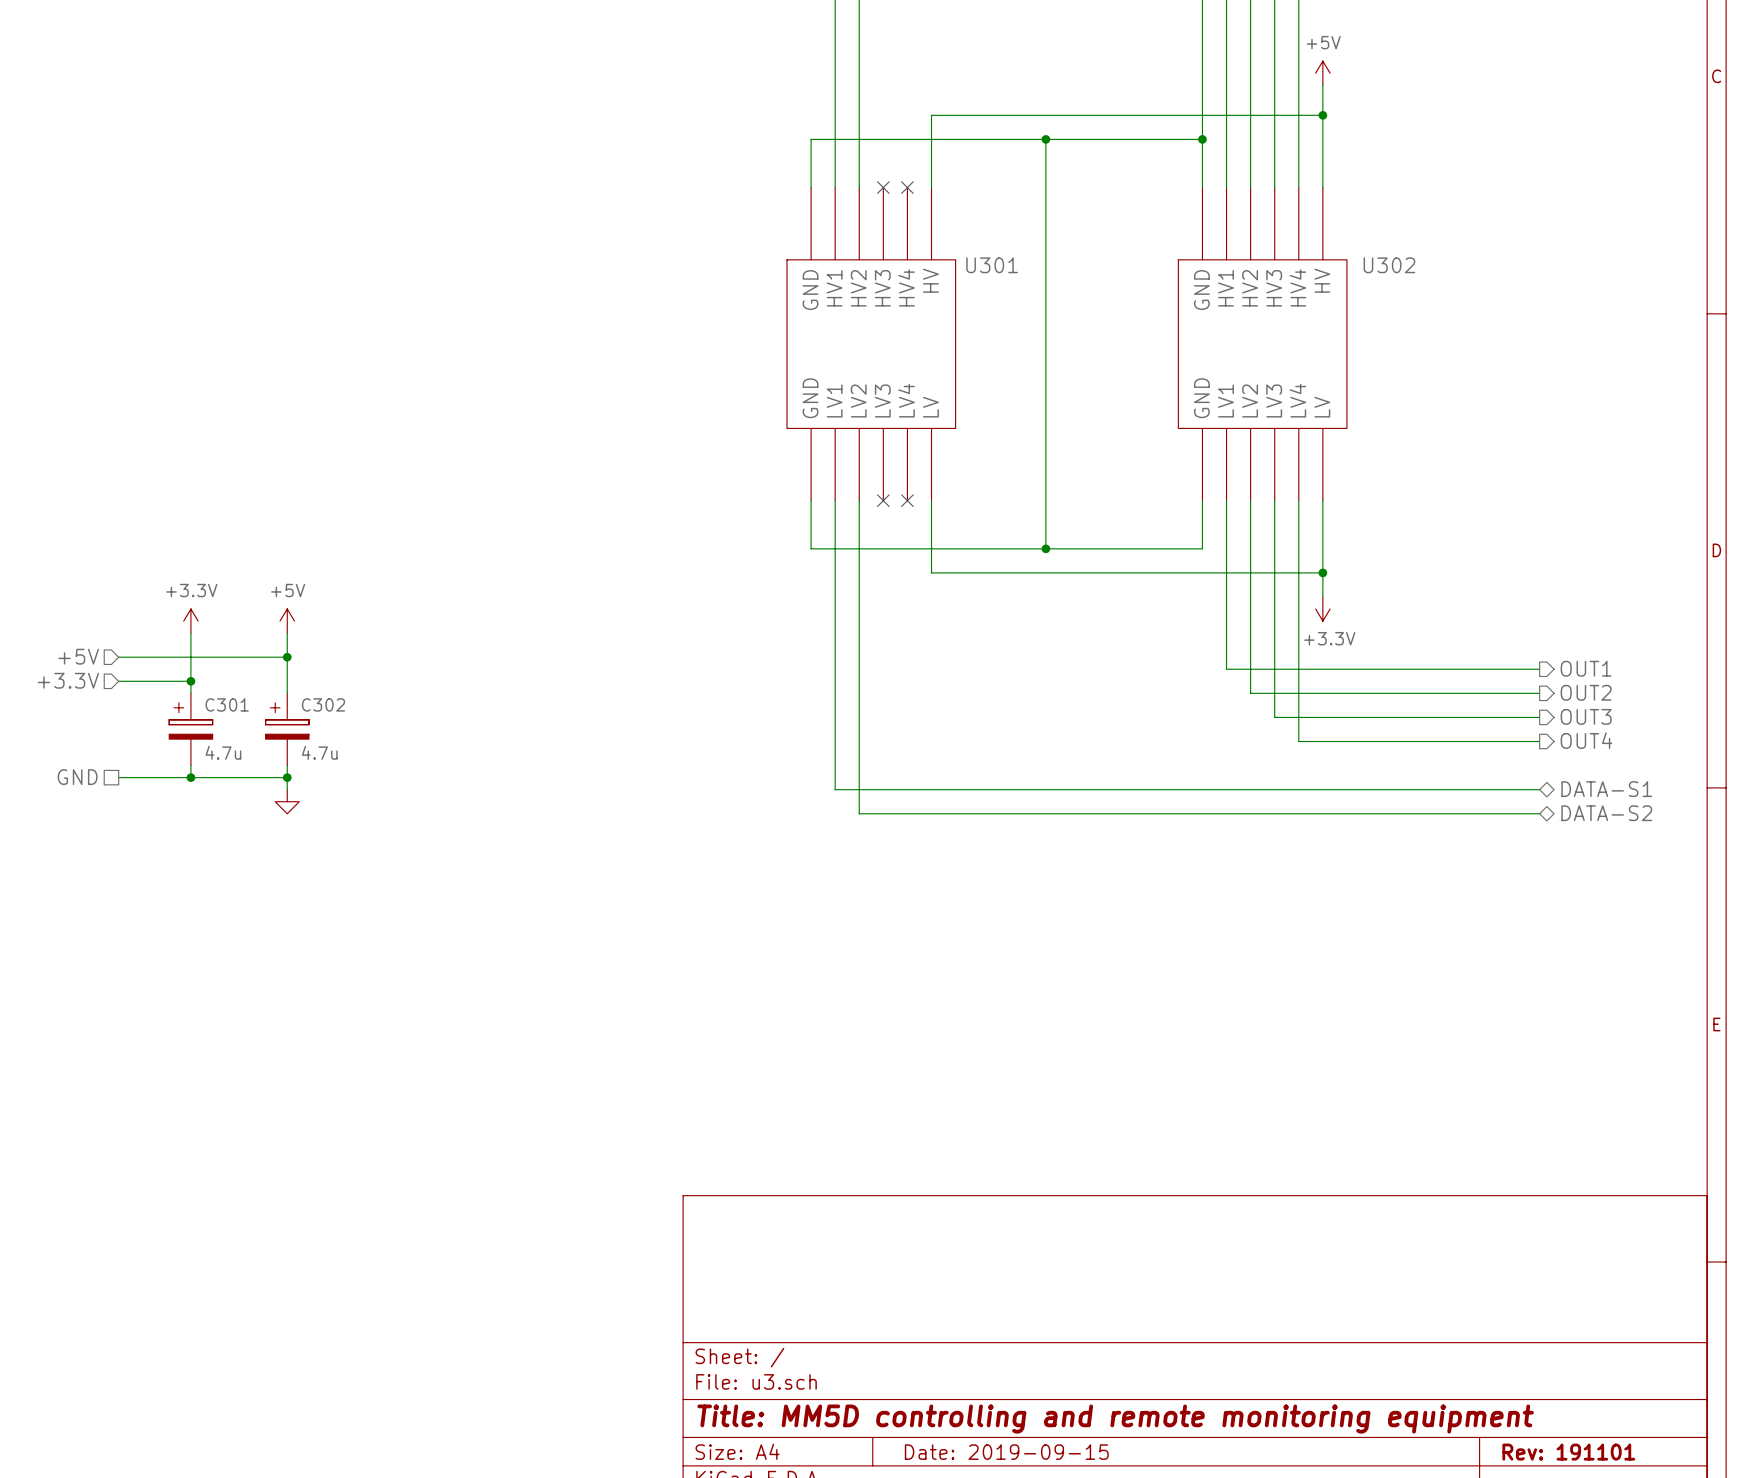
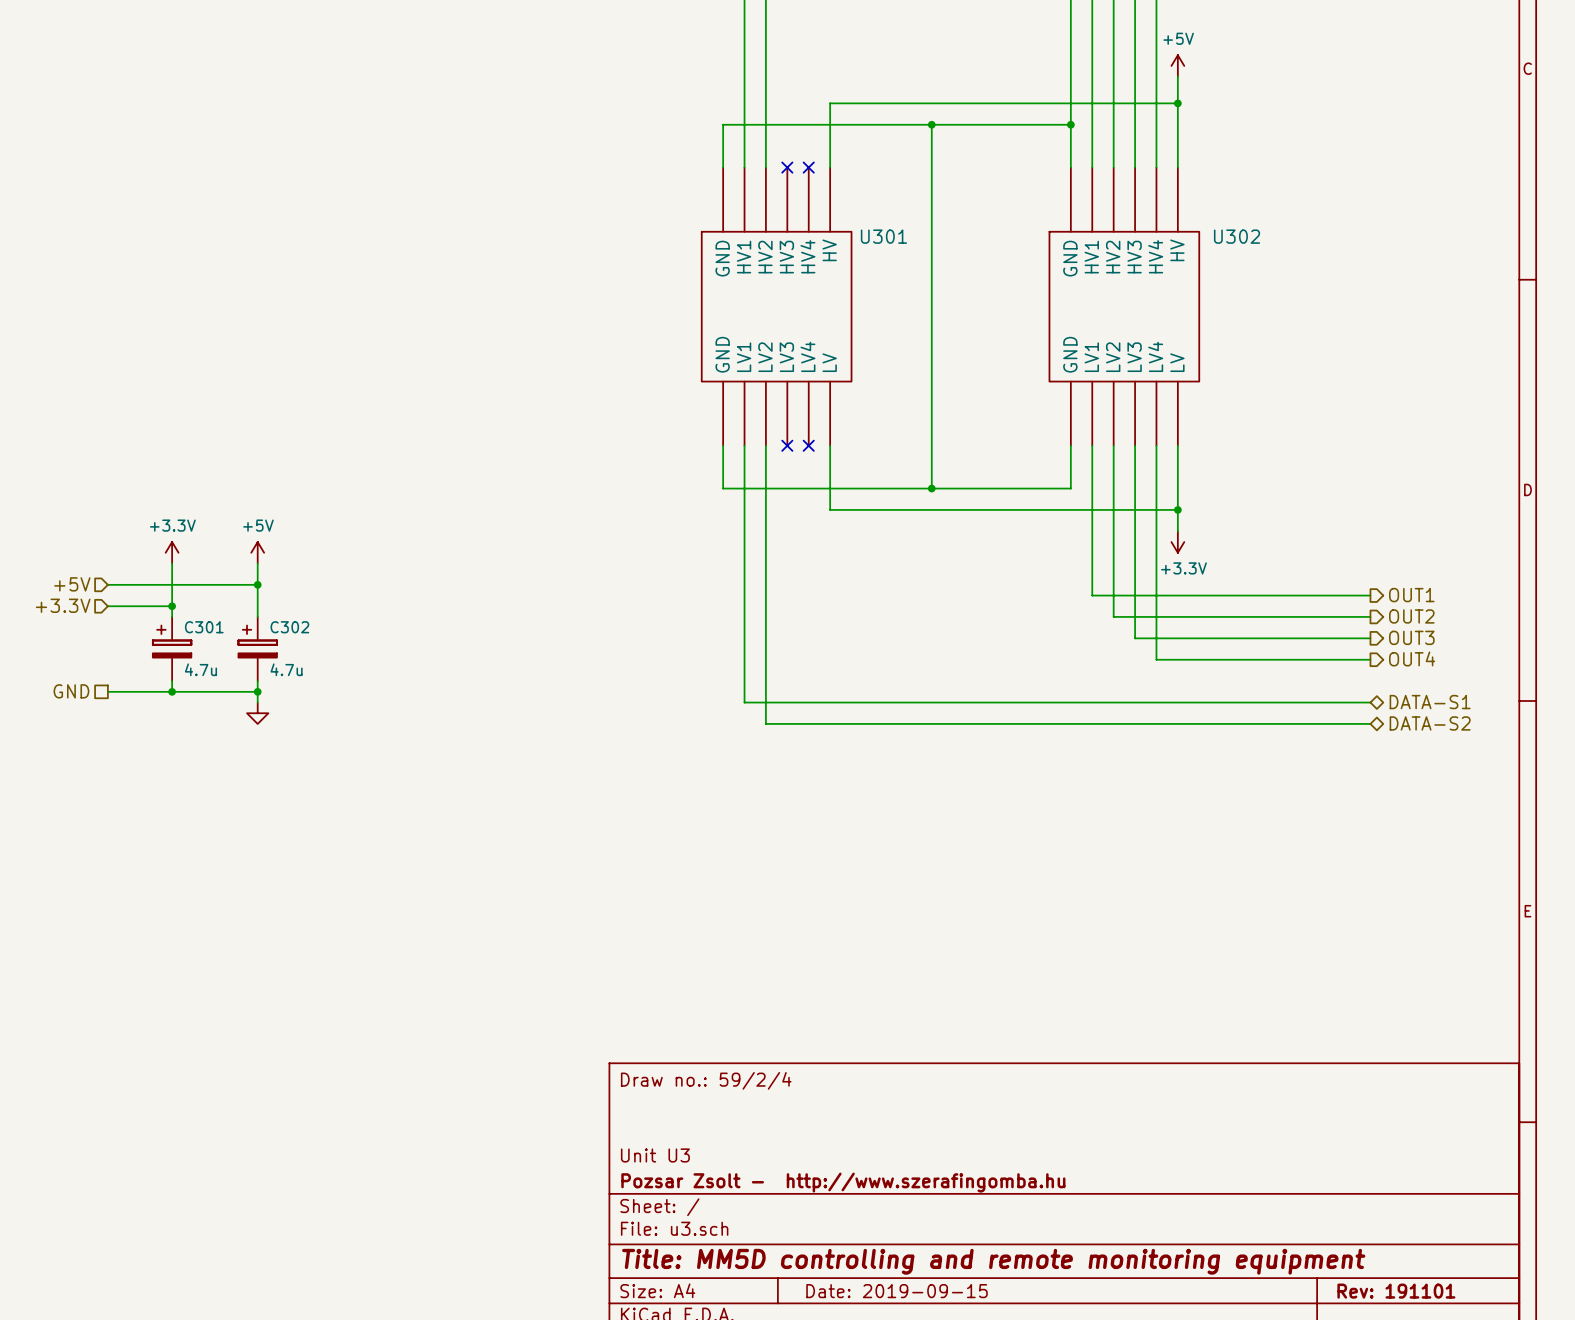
title block: none -> Draw no.: 59/2/4 (706, 1080)
title block: none -> Unit U3 (655, 1155)
title block: none -> Pozsar Zsolt - http://www.szerafingomba.hu (843, 1182)

